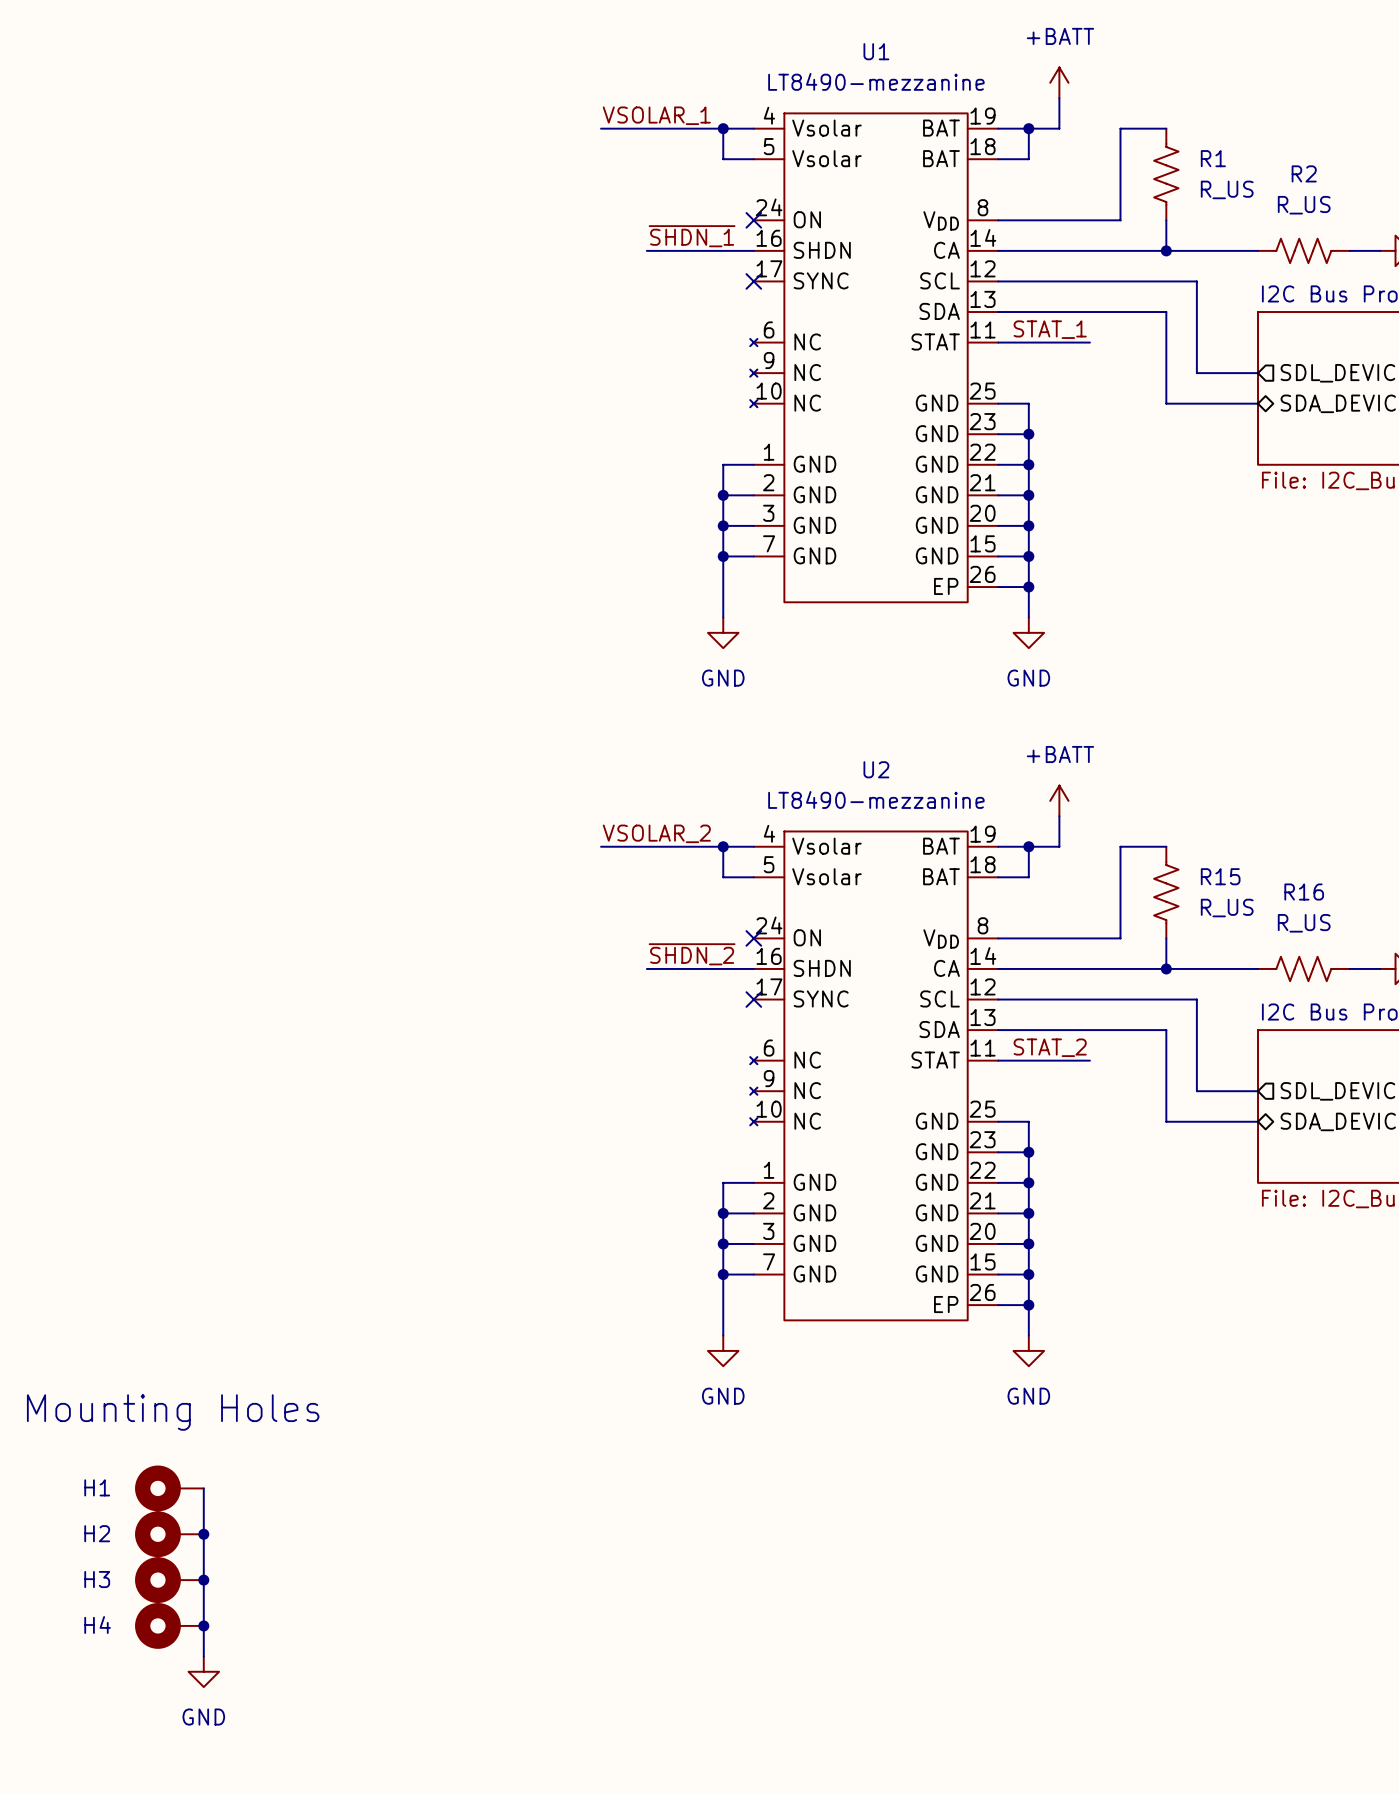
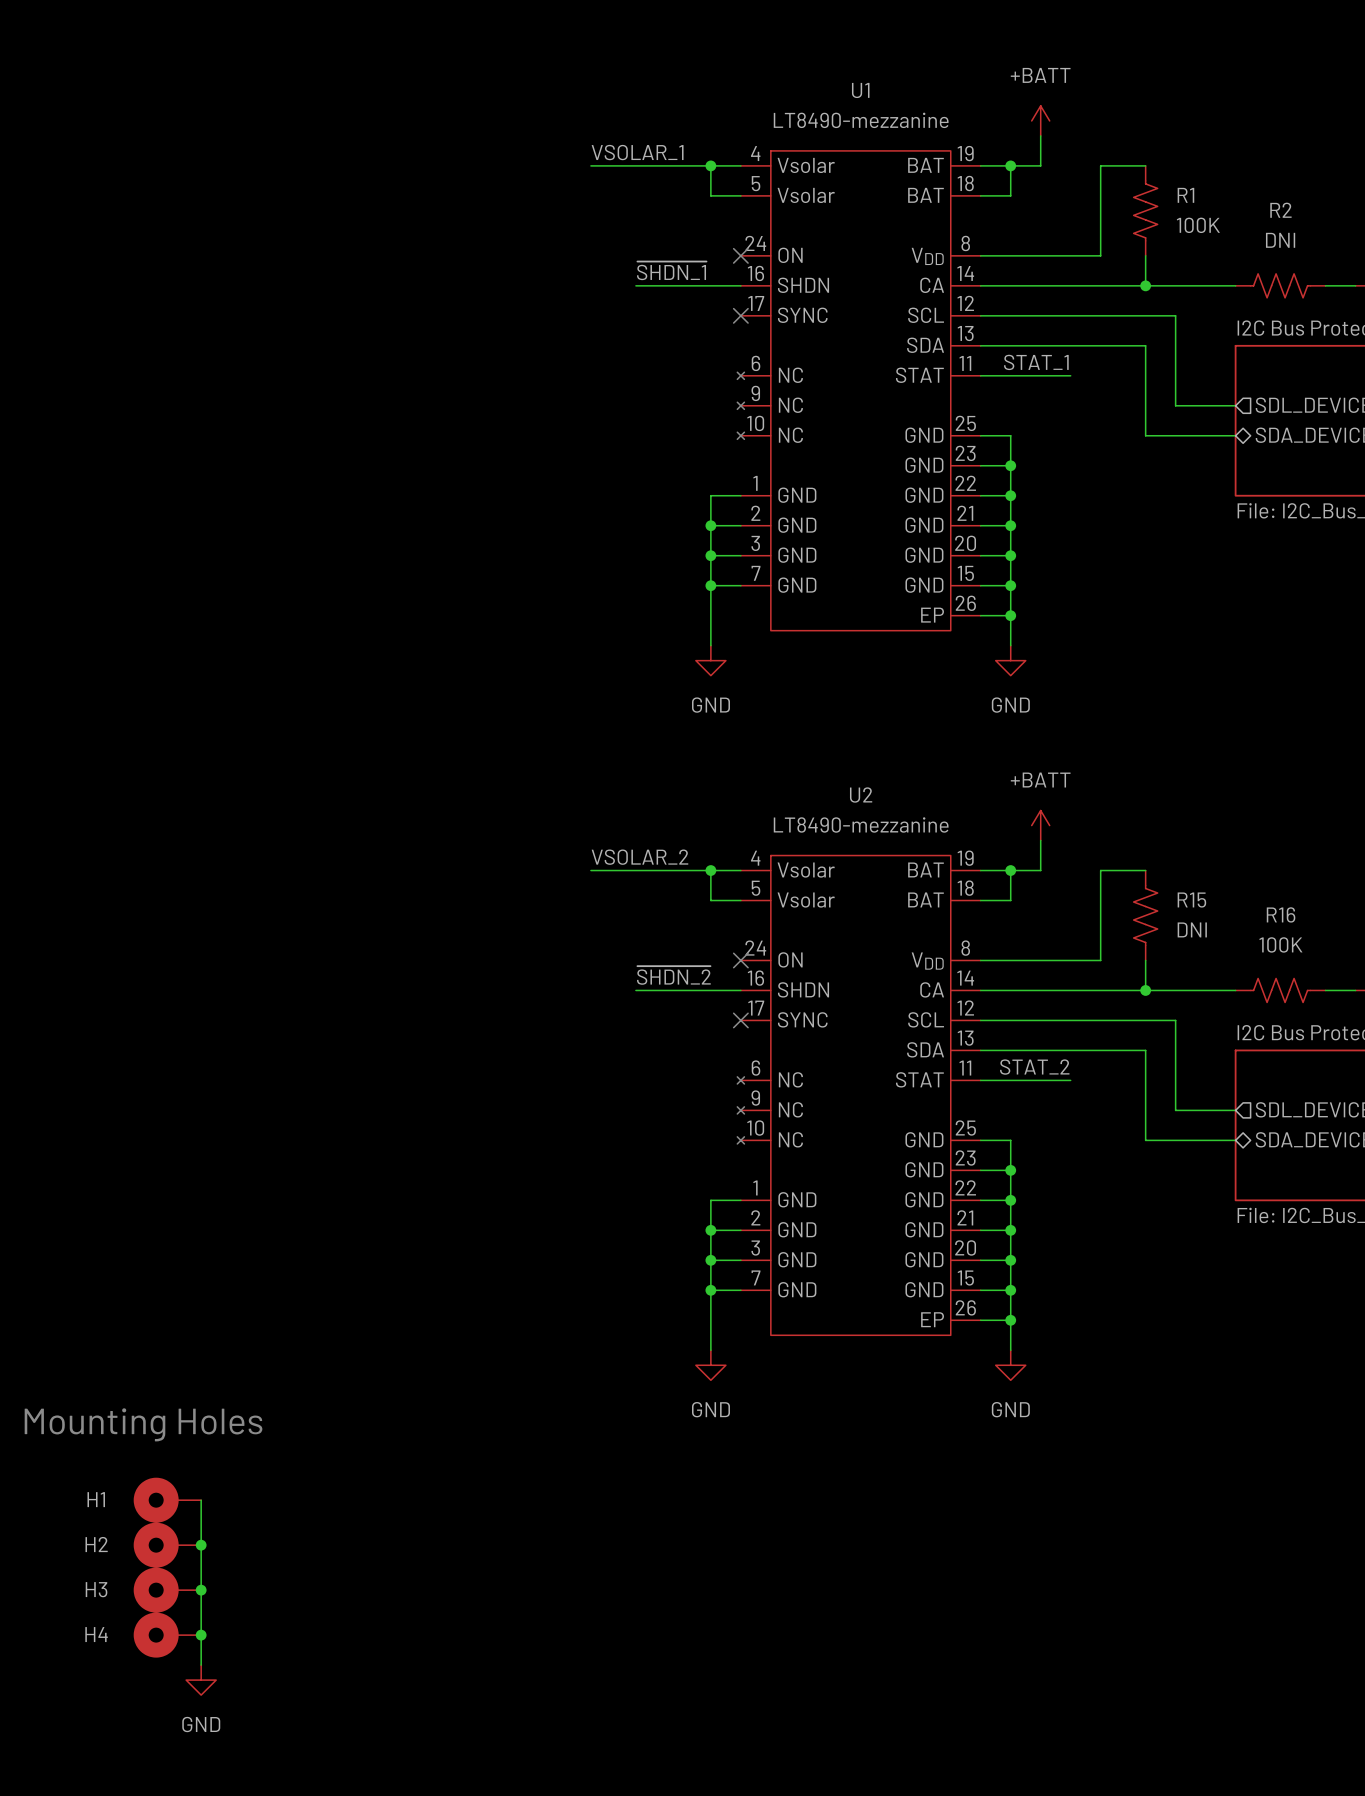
R1 value: R_US (1227, 189) -> 100K (1198, 225)
R2 value: R_US (1304, 205) -> DNI (1280, 240)
R15 value: R_US (1227, 908) -> DNI (1192, 929)
R16 value: R_US (1304, 923) -> 100K (1280, 944)

